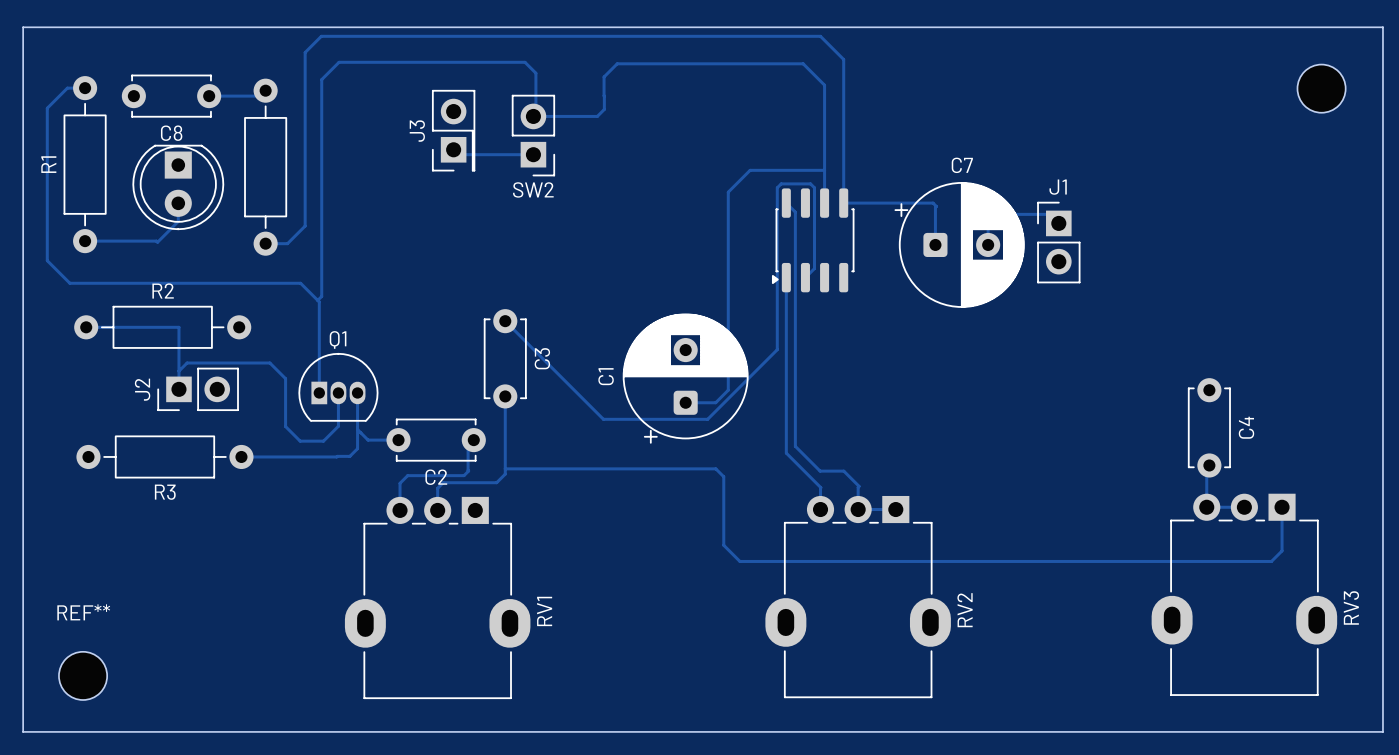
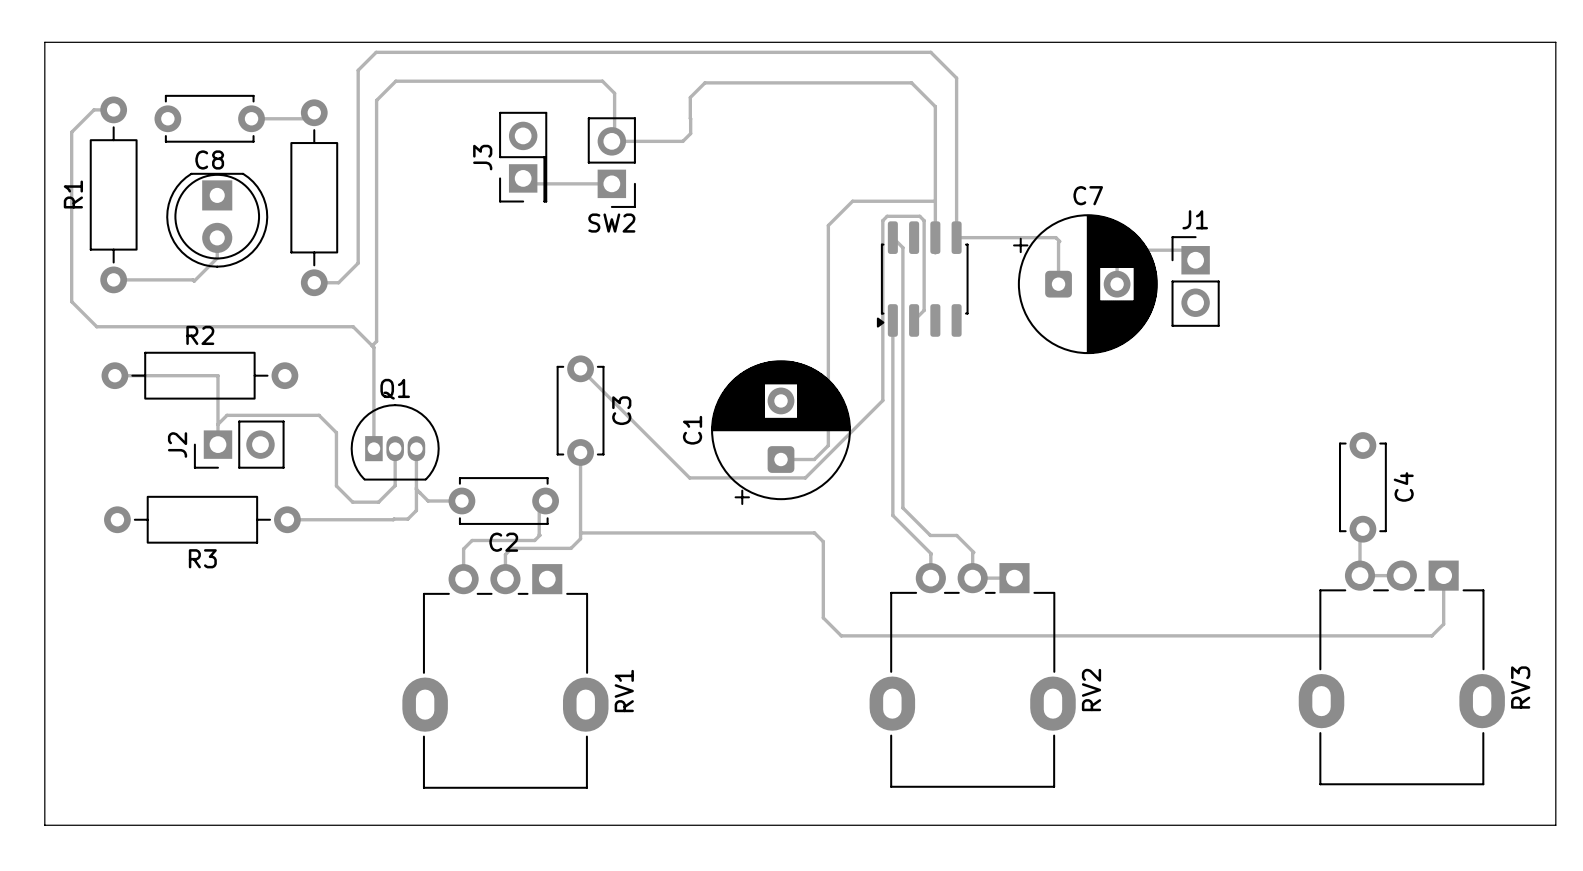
part: (1321, 88) -> none
REF**: (83, 675) -> none

